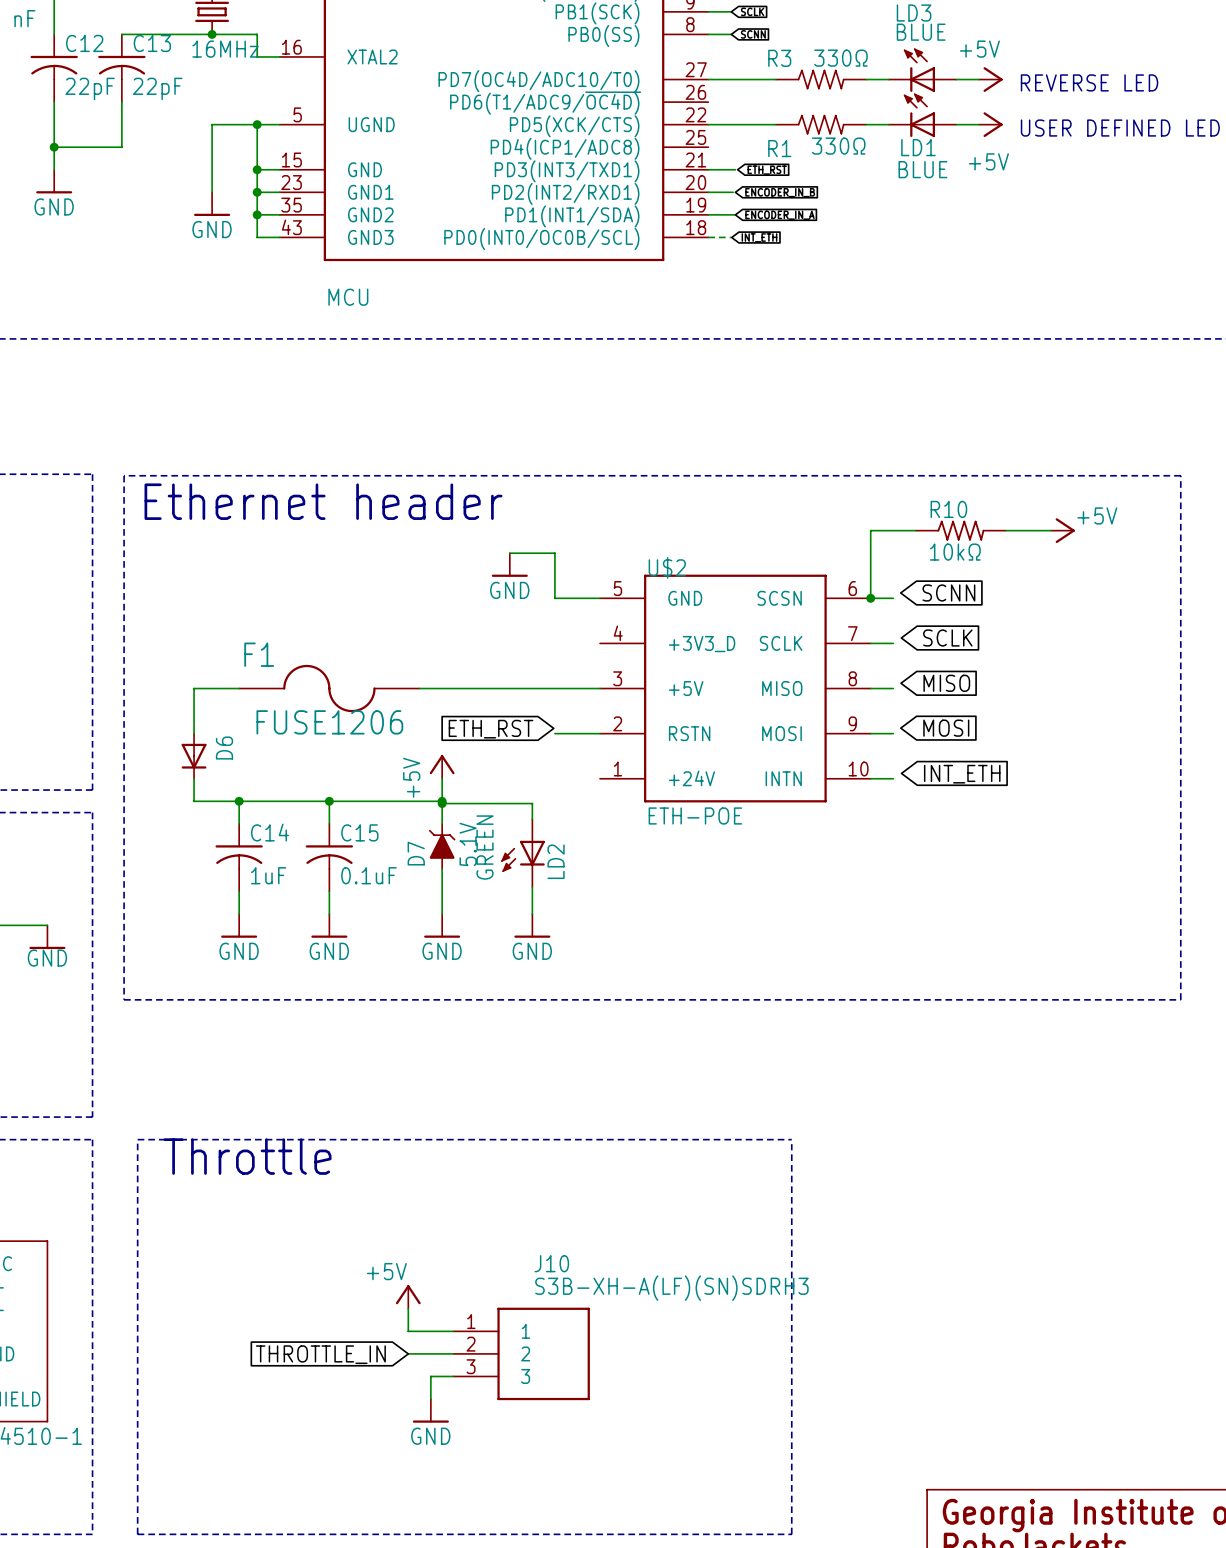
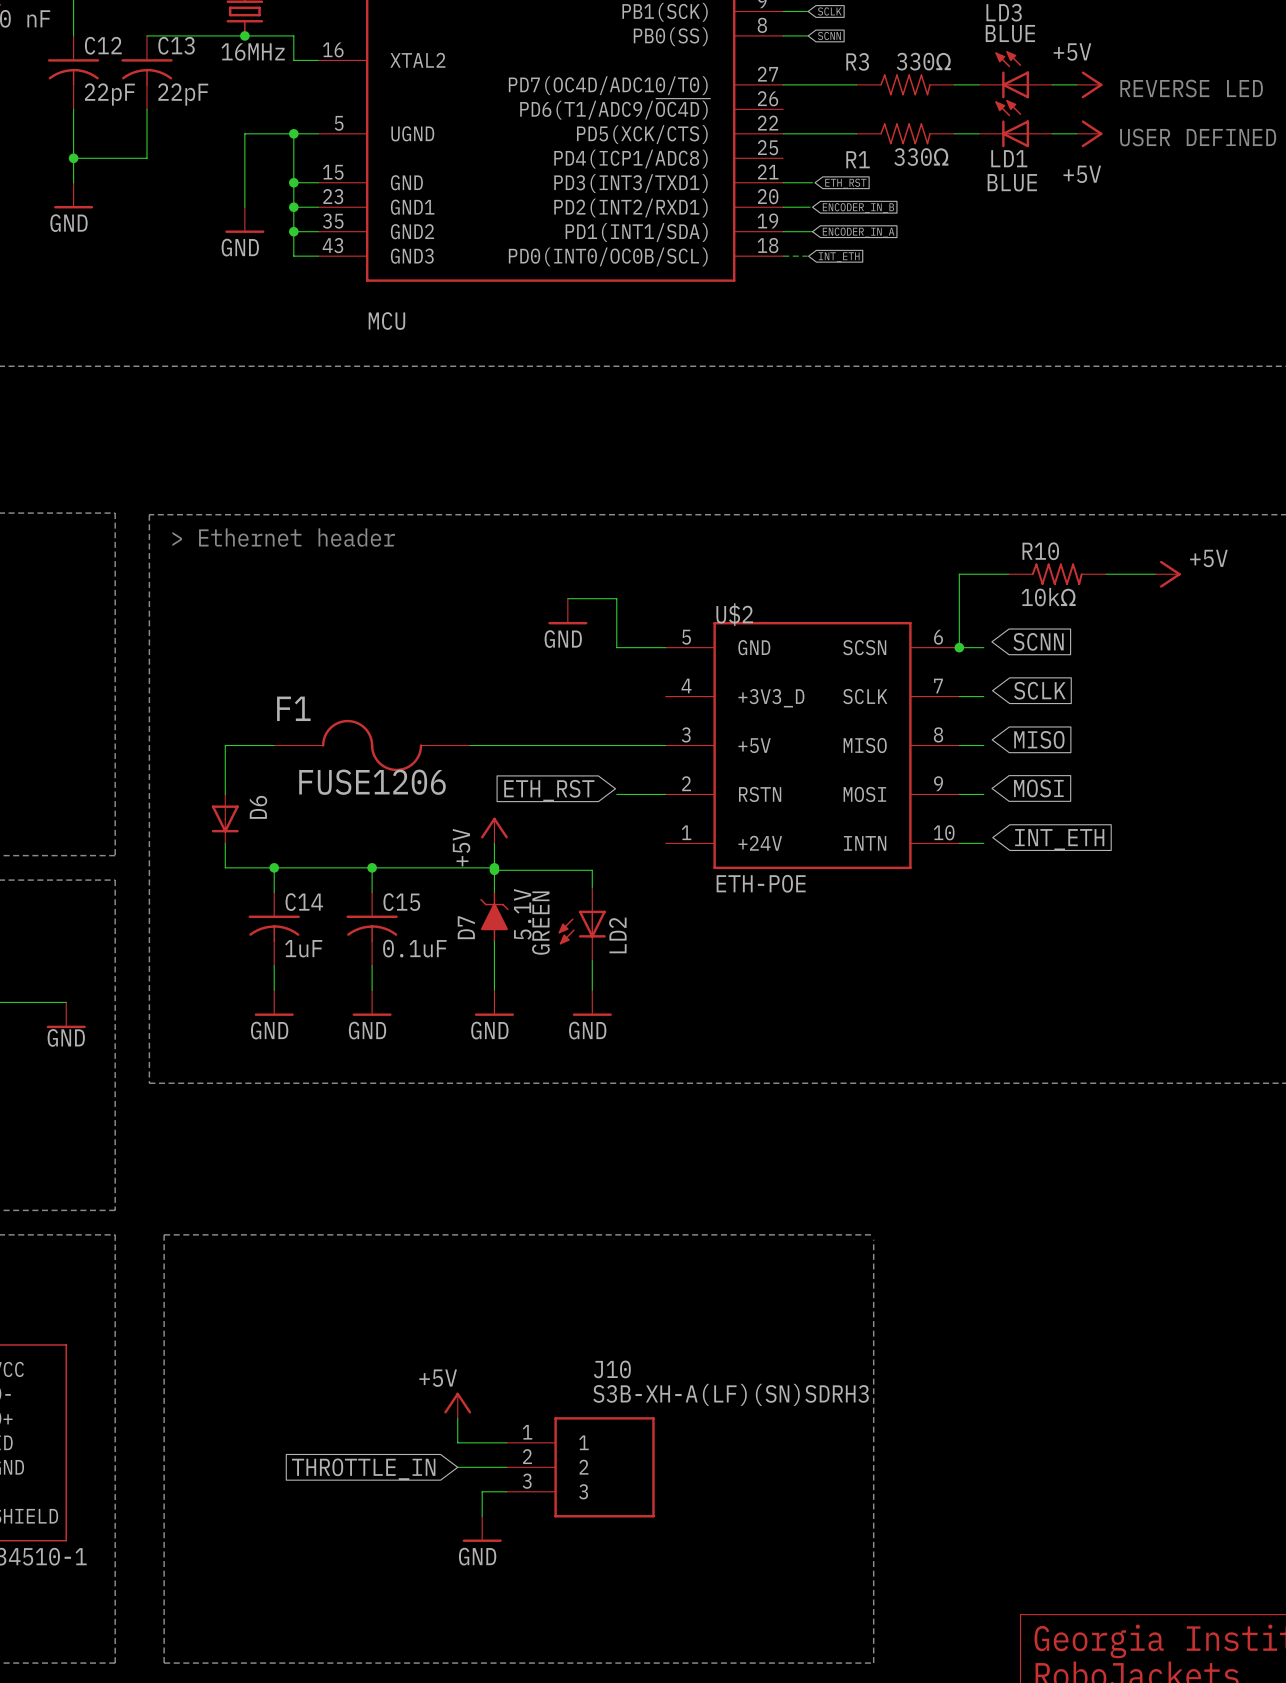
text: Ethernet header (323, 501) -> > Ethernet header (283, 537)
text: Throttle (247, 1156) -> none

